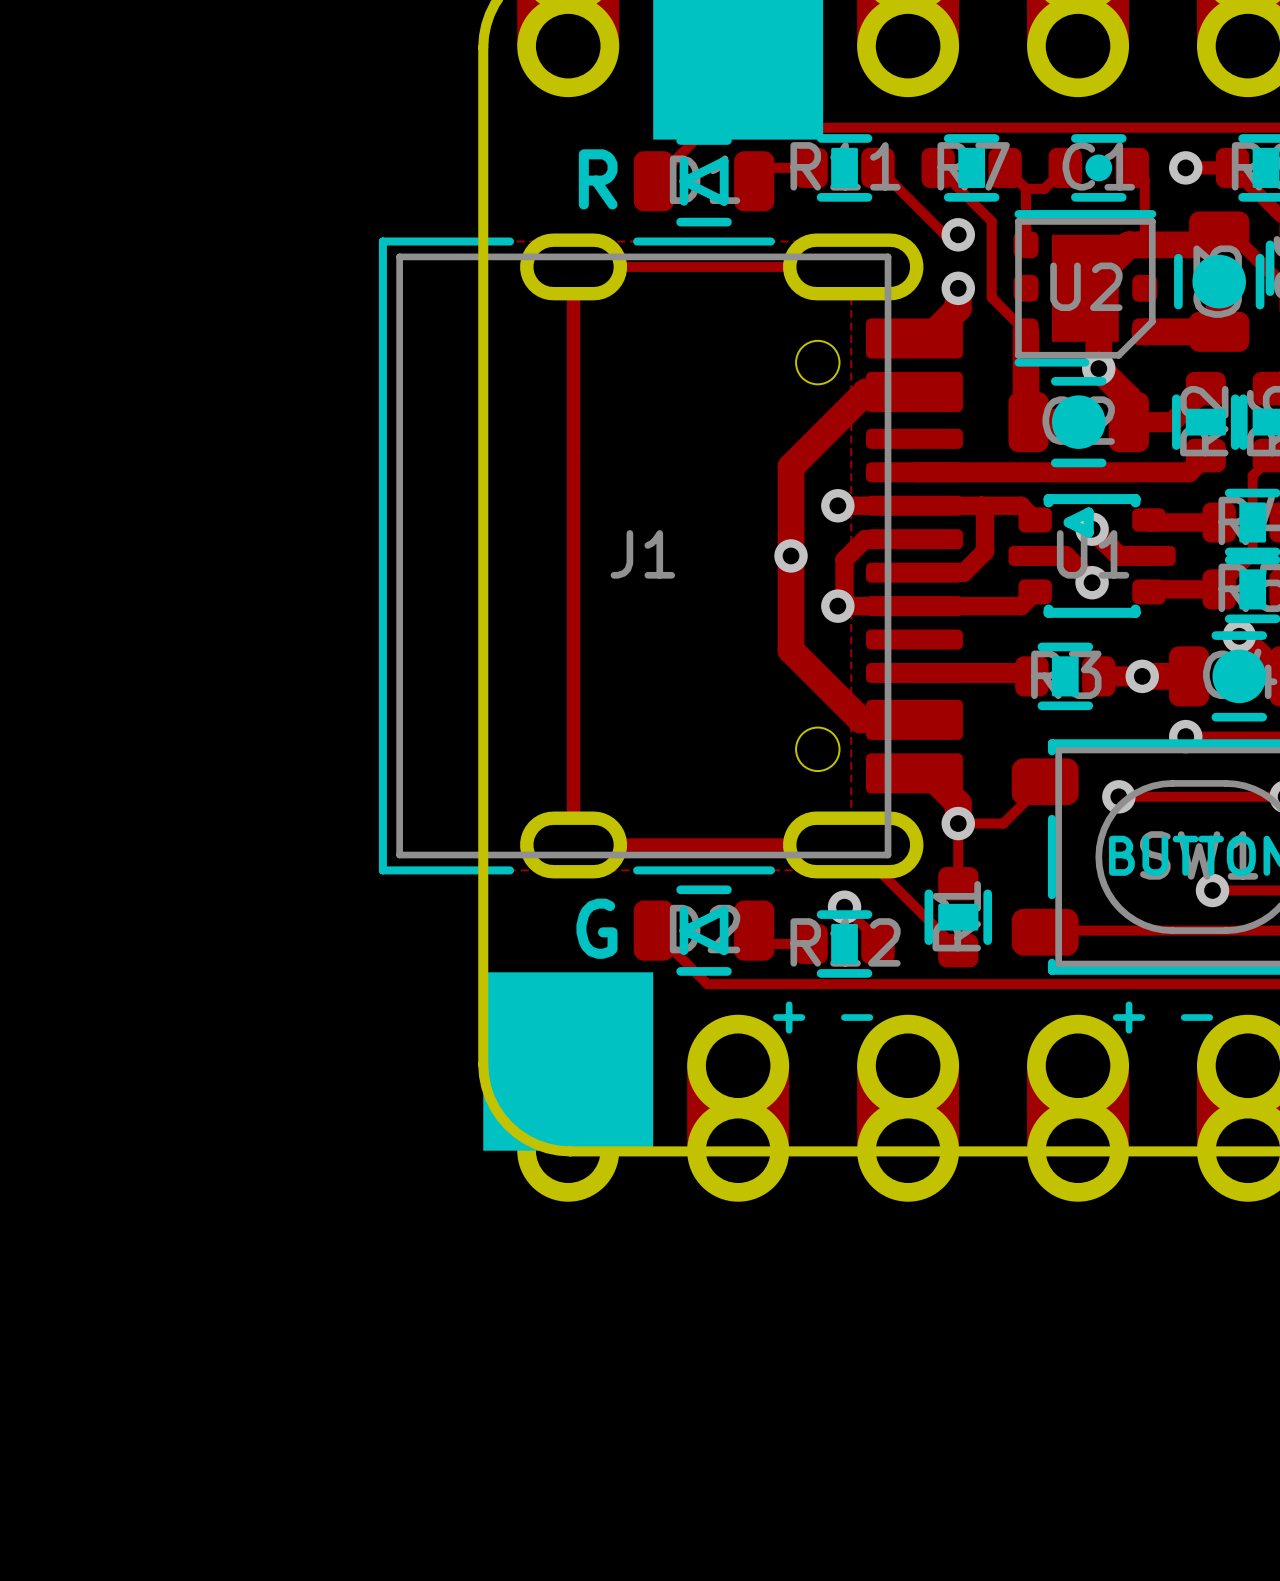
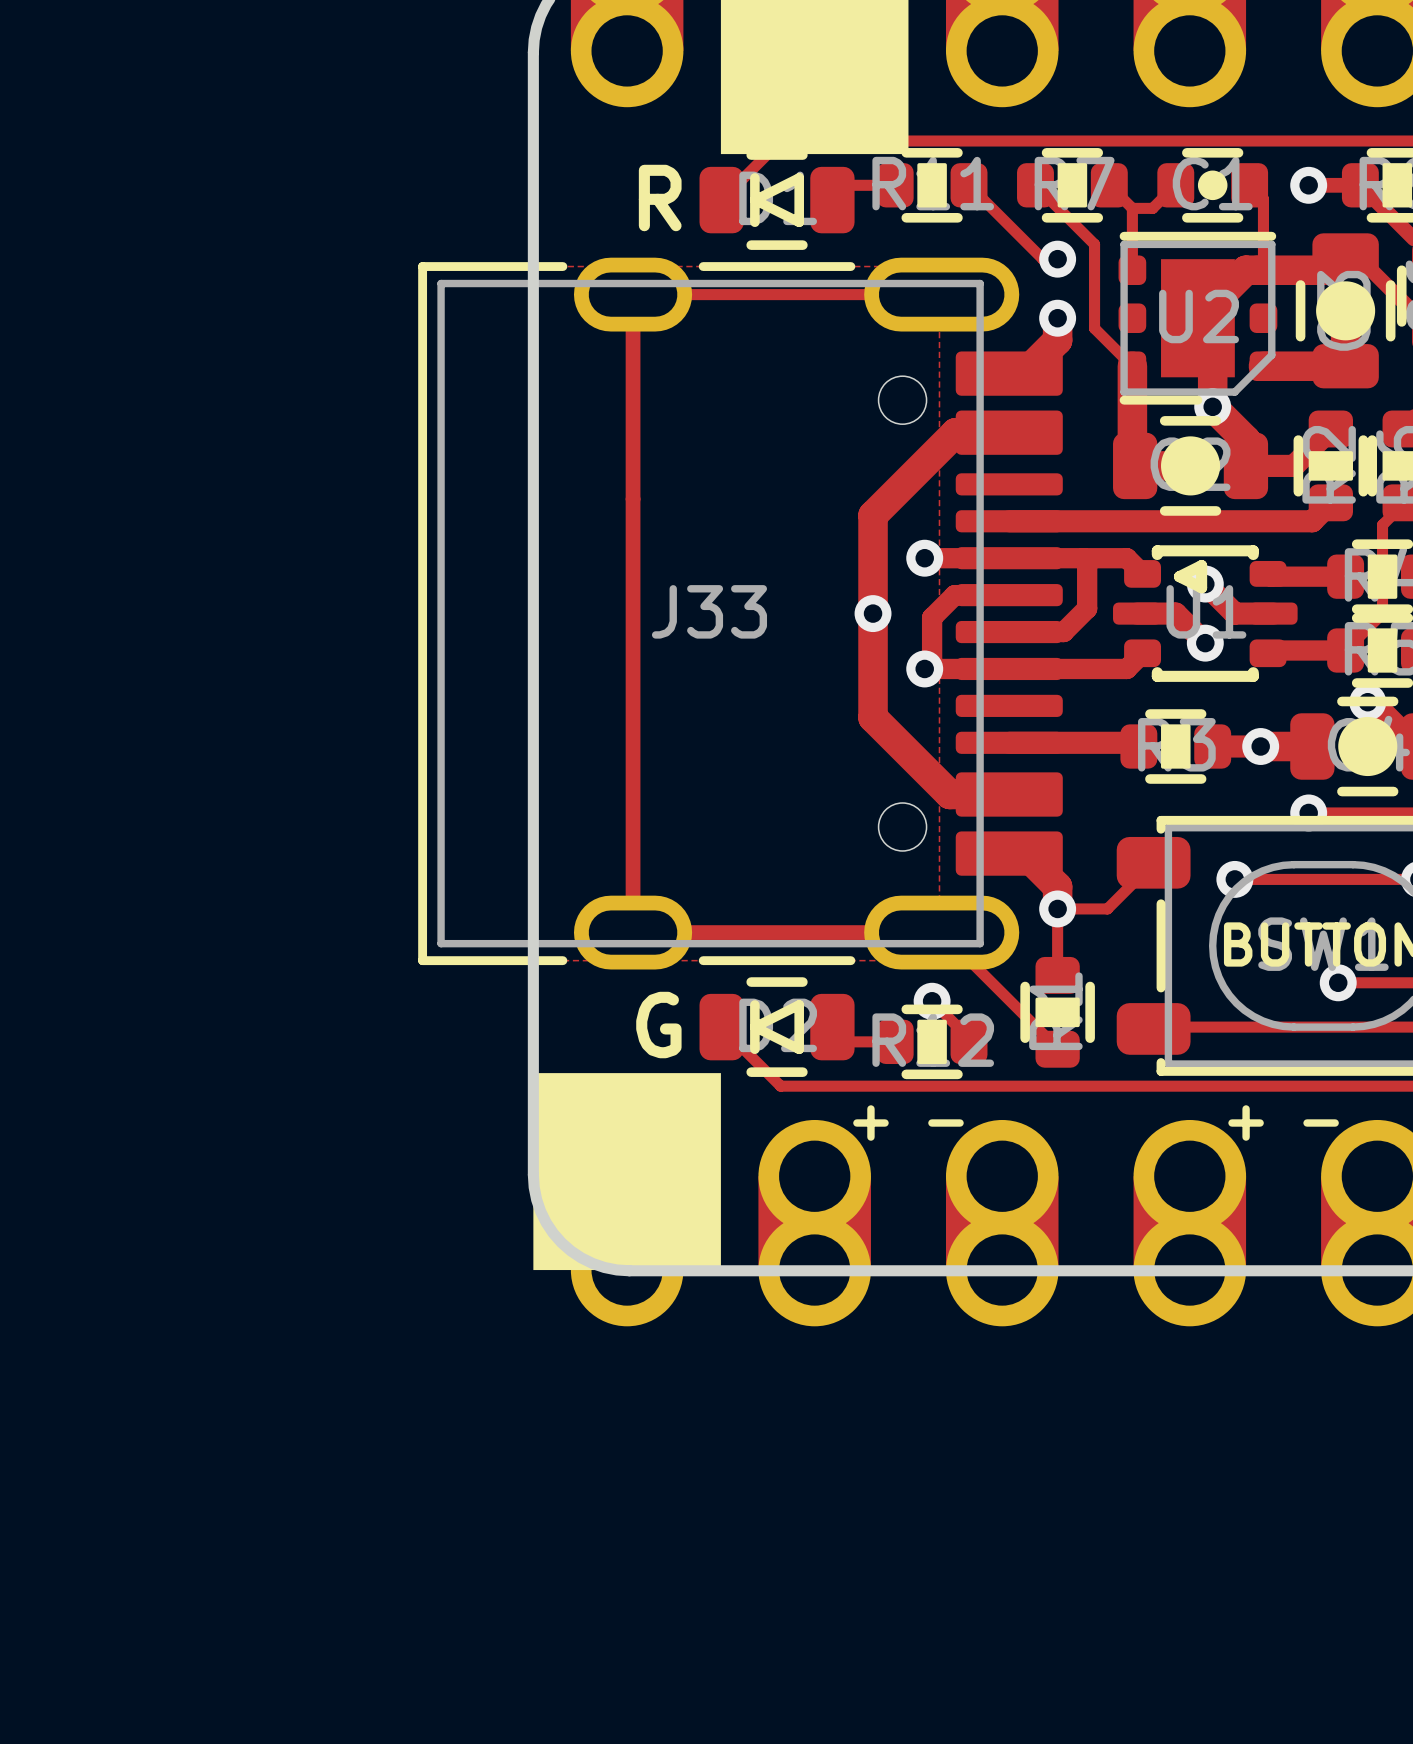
J1 name: J1 (642, 554) -> J33 (709, 611)

